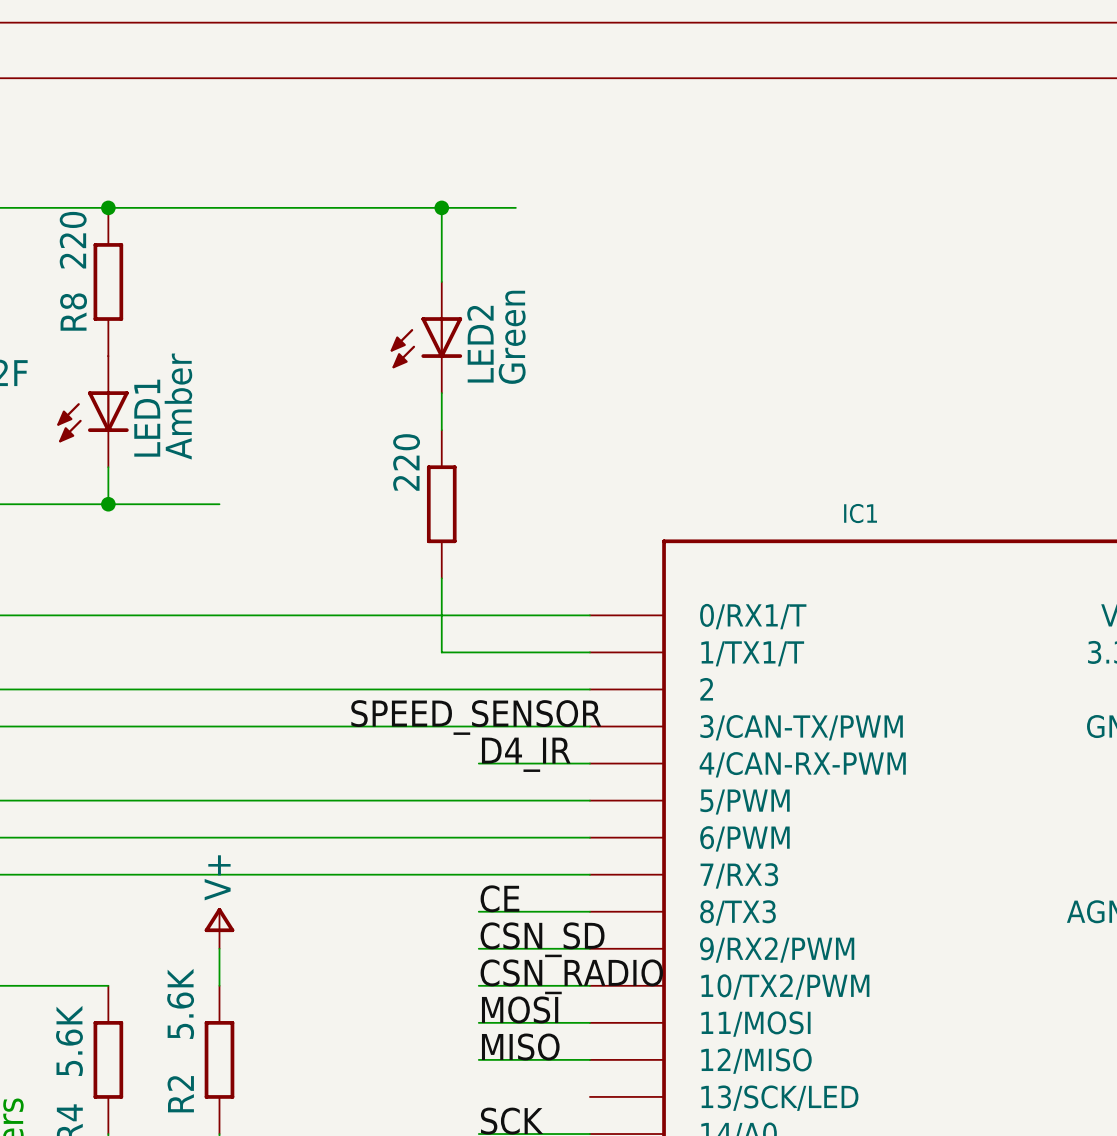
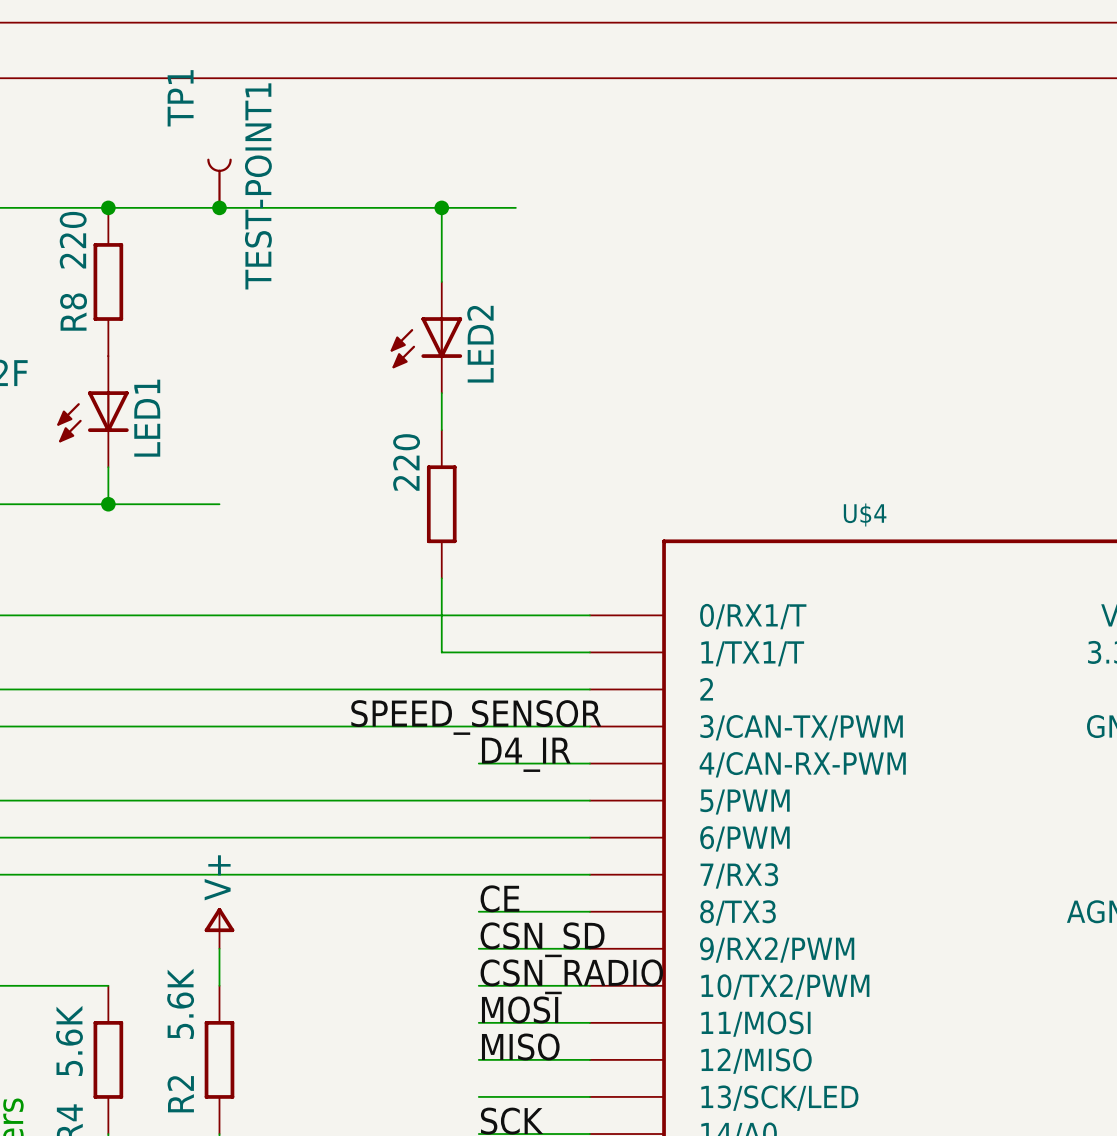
TP1: none -> TEST-POINT1 (219, 183)
junction: none -> (219, 207)
LED2 value: Green (512, 337) -> none
LED1 value: Amber (178, 406) -> none
IC1 name: IC1 (860, 513) -> U$4 (865, 514)
wire: none -> (478, 1096) (589, 1096)

